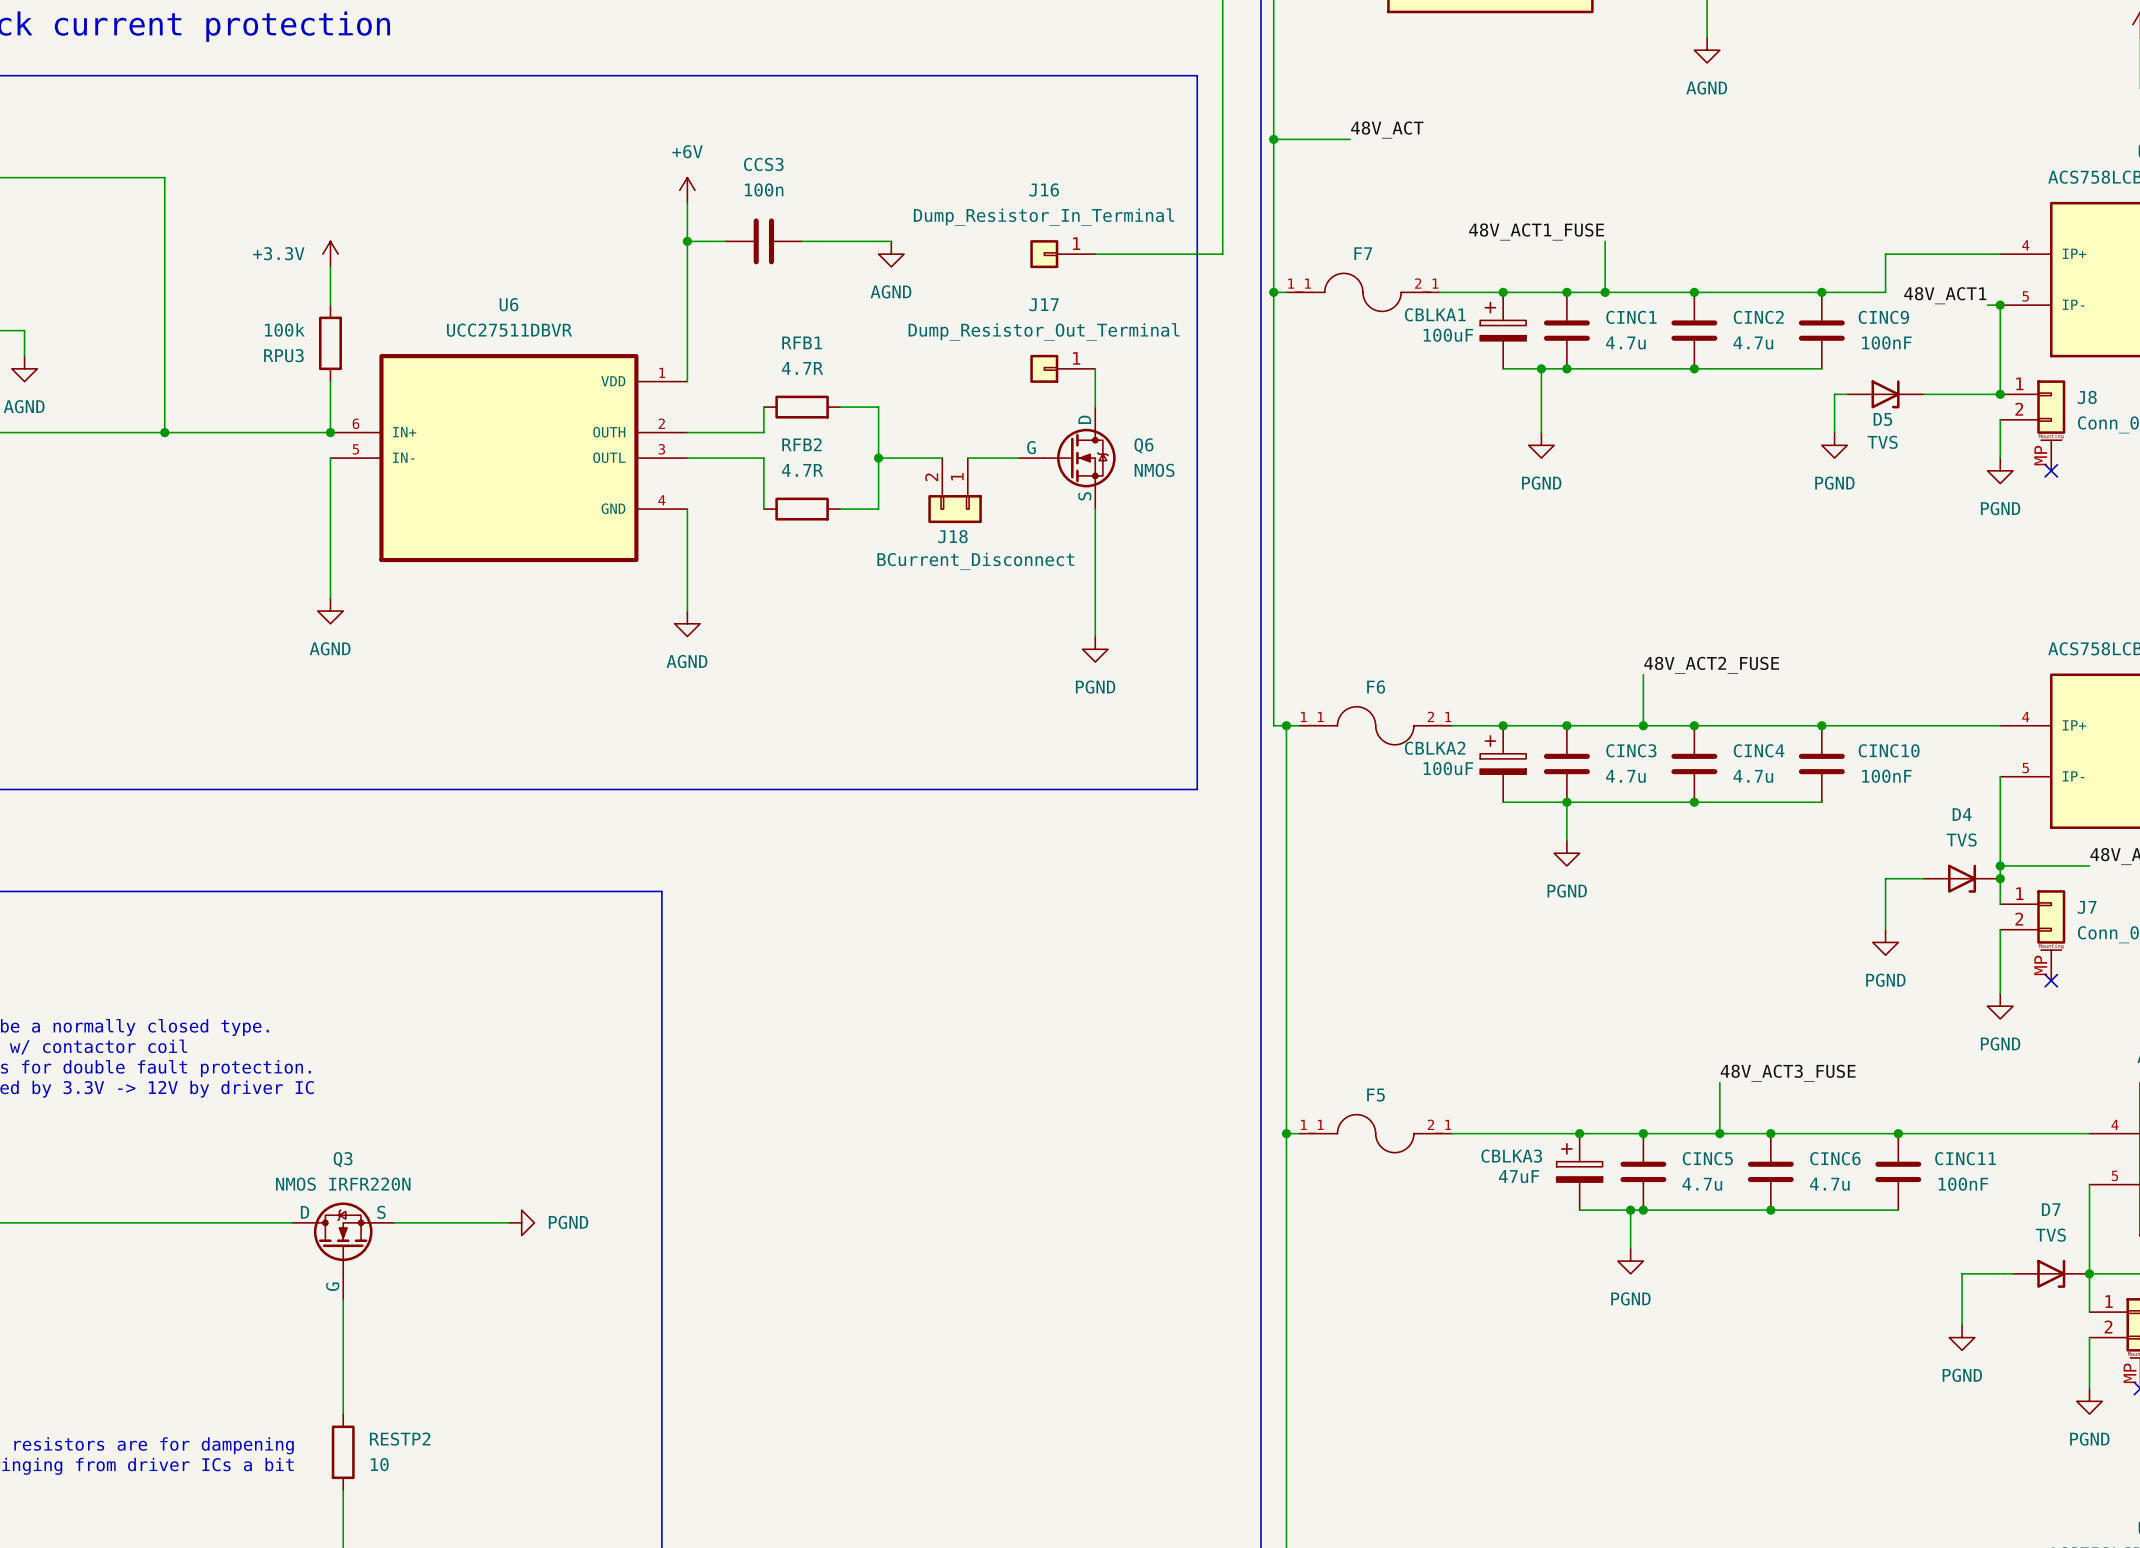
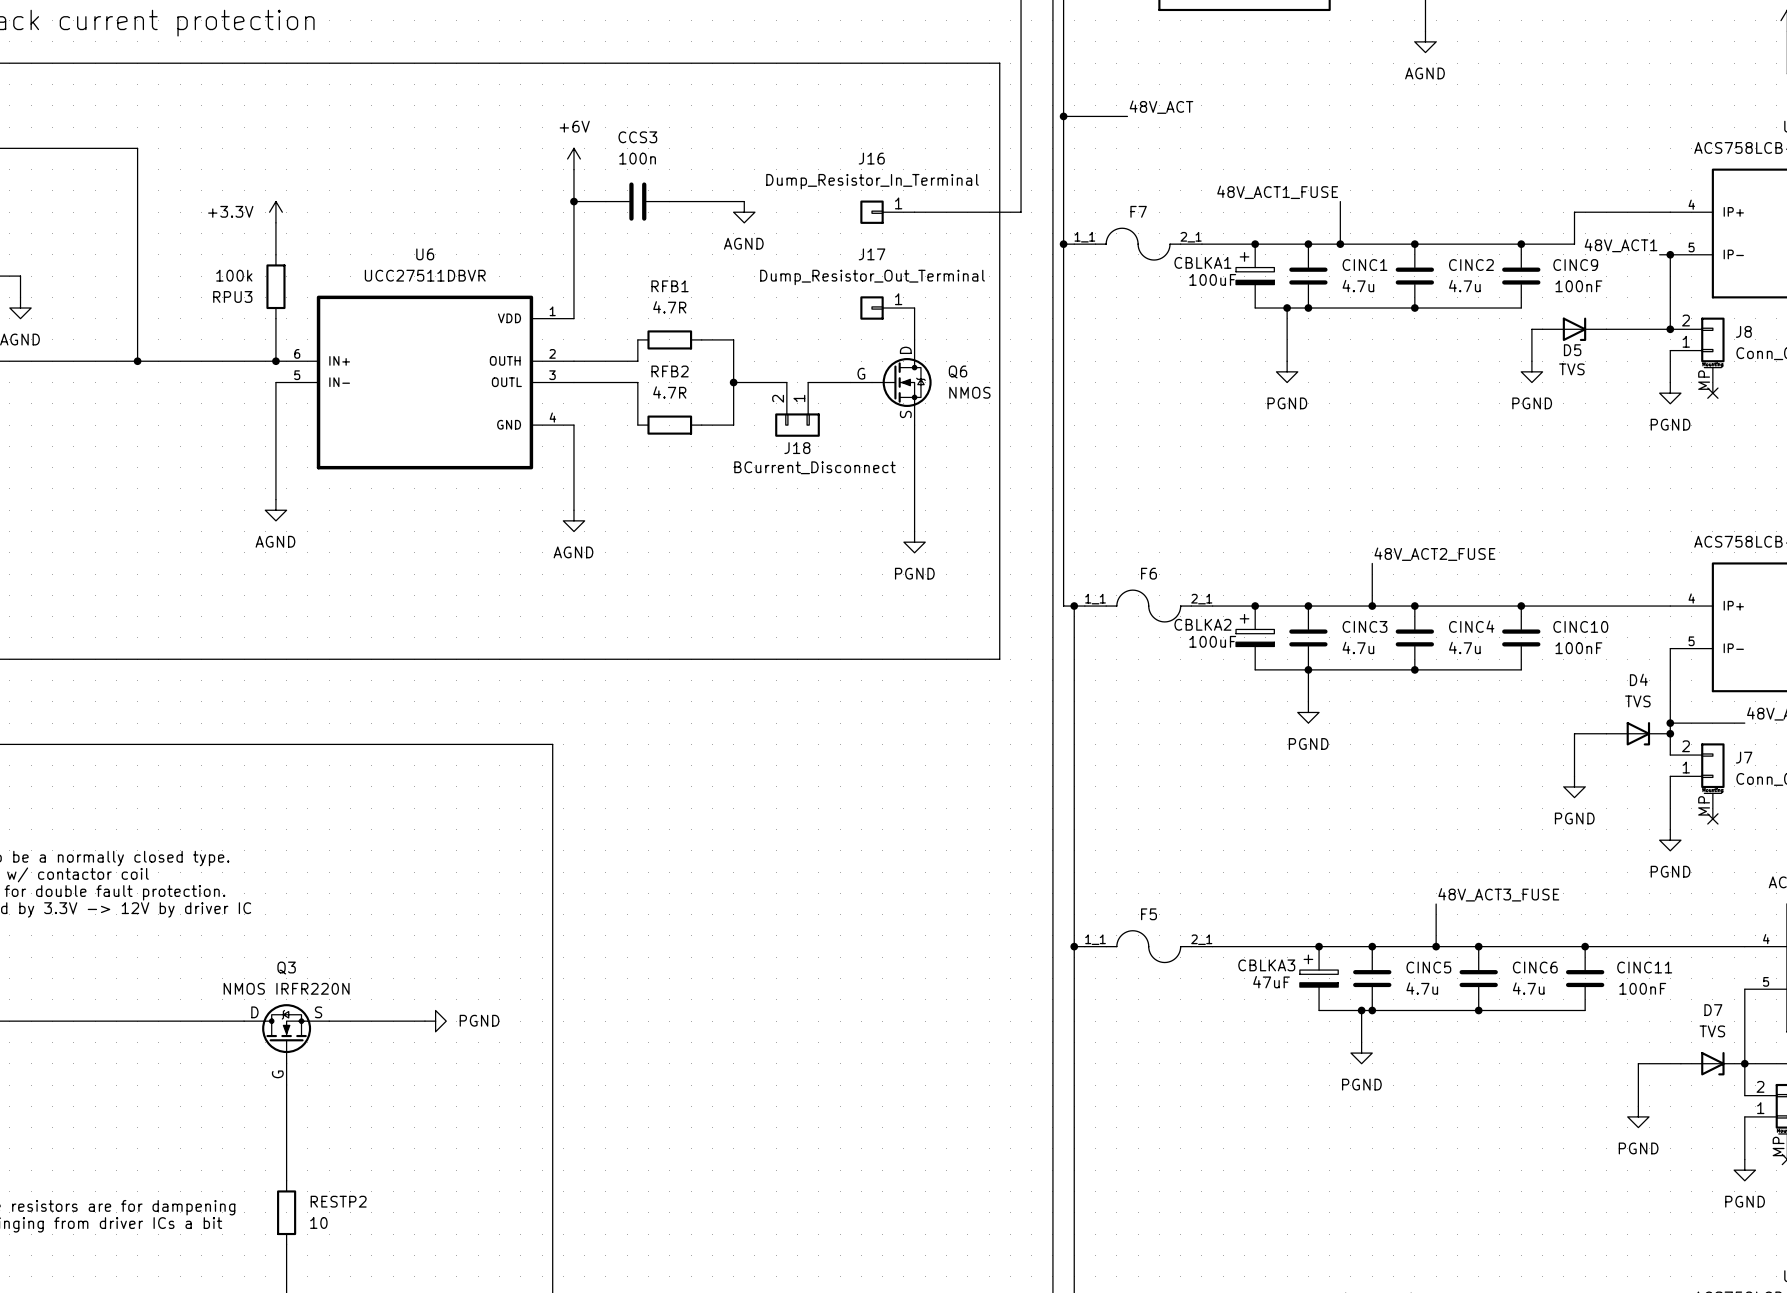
J8 pin number: 1 (2019, 383) -> 2 (1686, 320)
J8 pin number: 2 (2019, 409) -> 1 (1686, 341)
J7 pin number: 1 (2019, 893) -> 2 (1686, 746)
J7 pin number: 2 (2019, 919) -> 1 (1686, 767)
part pin number: 1 (2109, 1301) -> 2 (1760, 1086)
part pin number: 2 (2108, 1326) -> 1 (1760, 1108)

